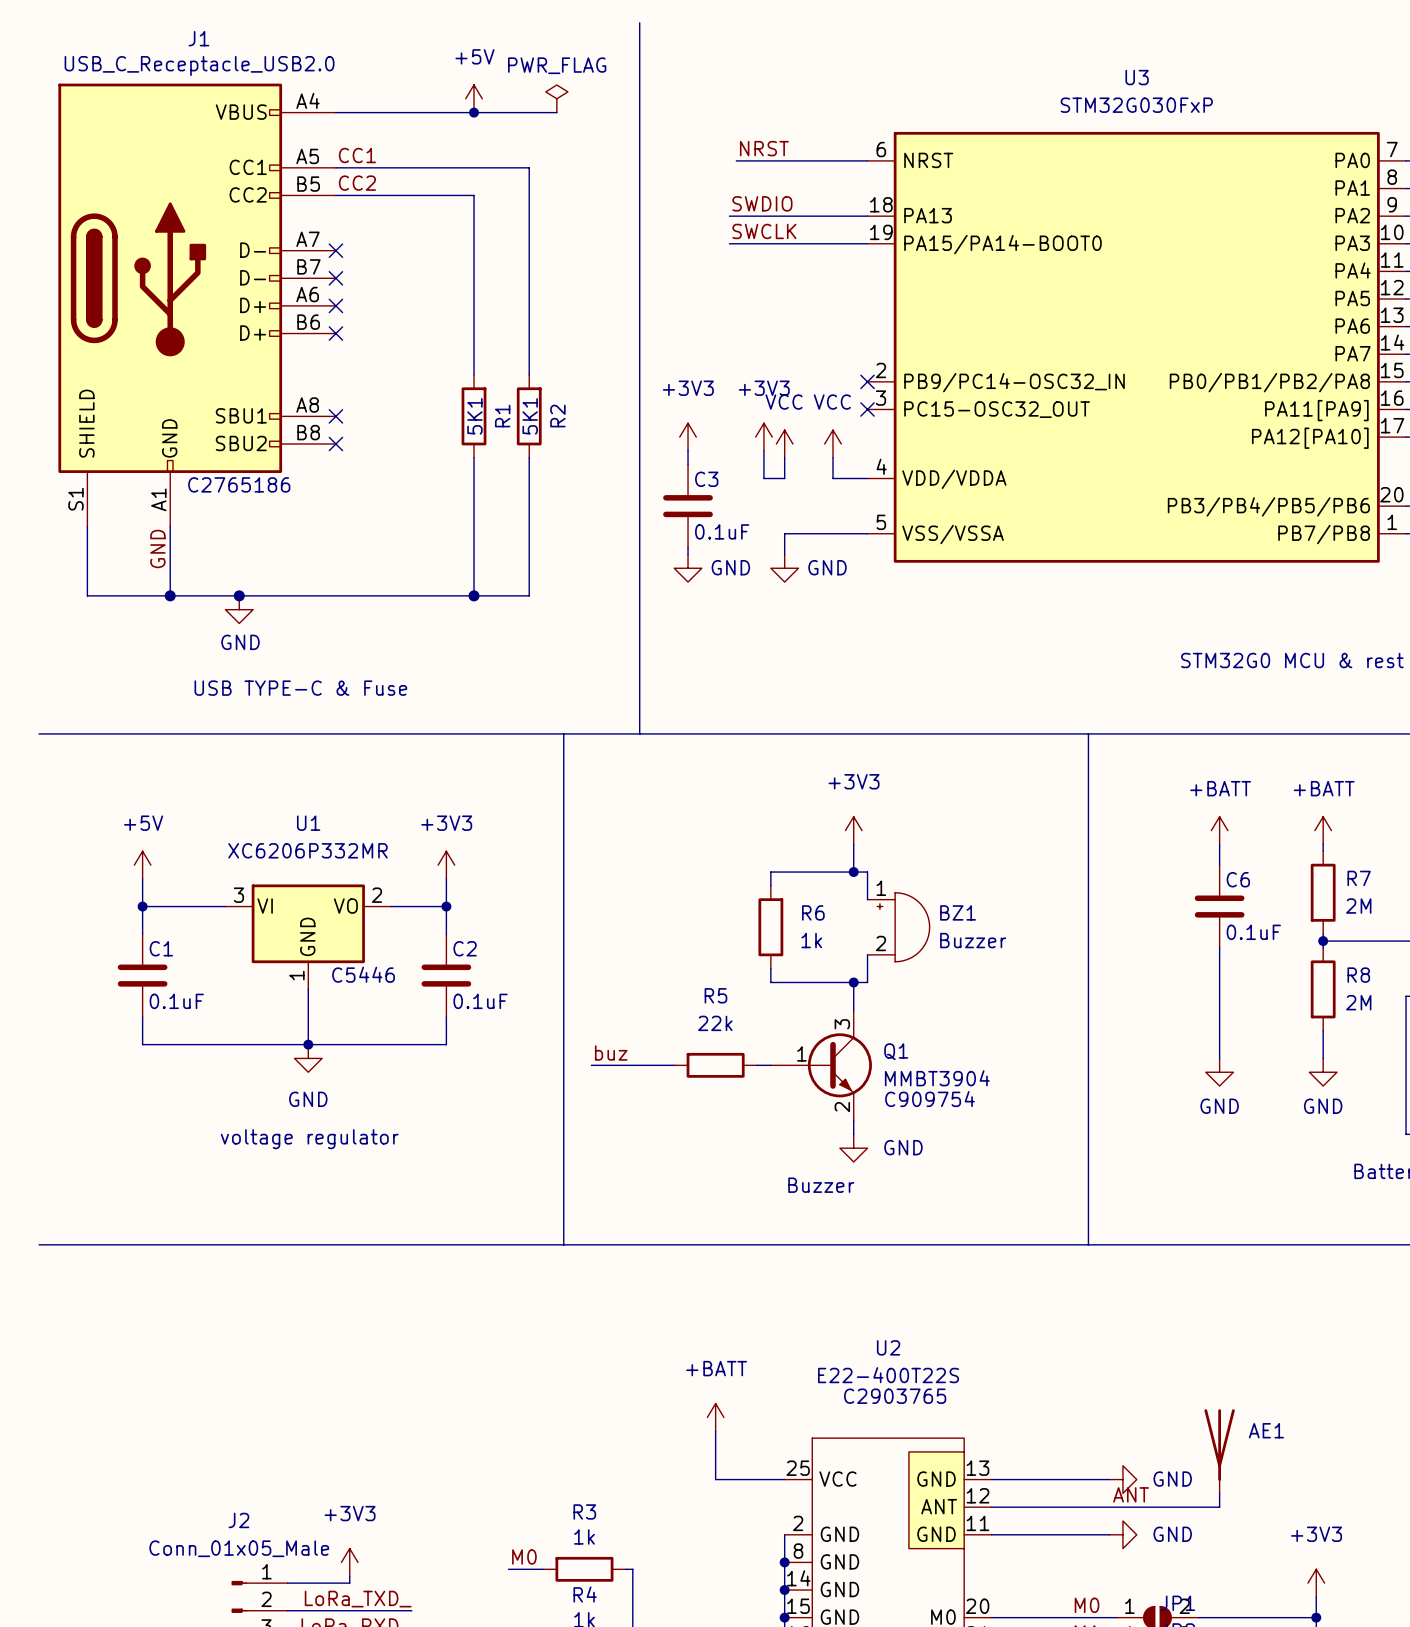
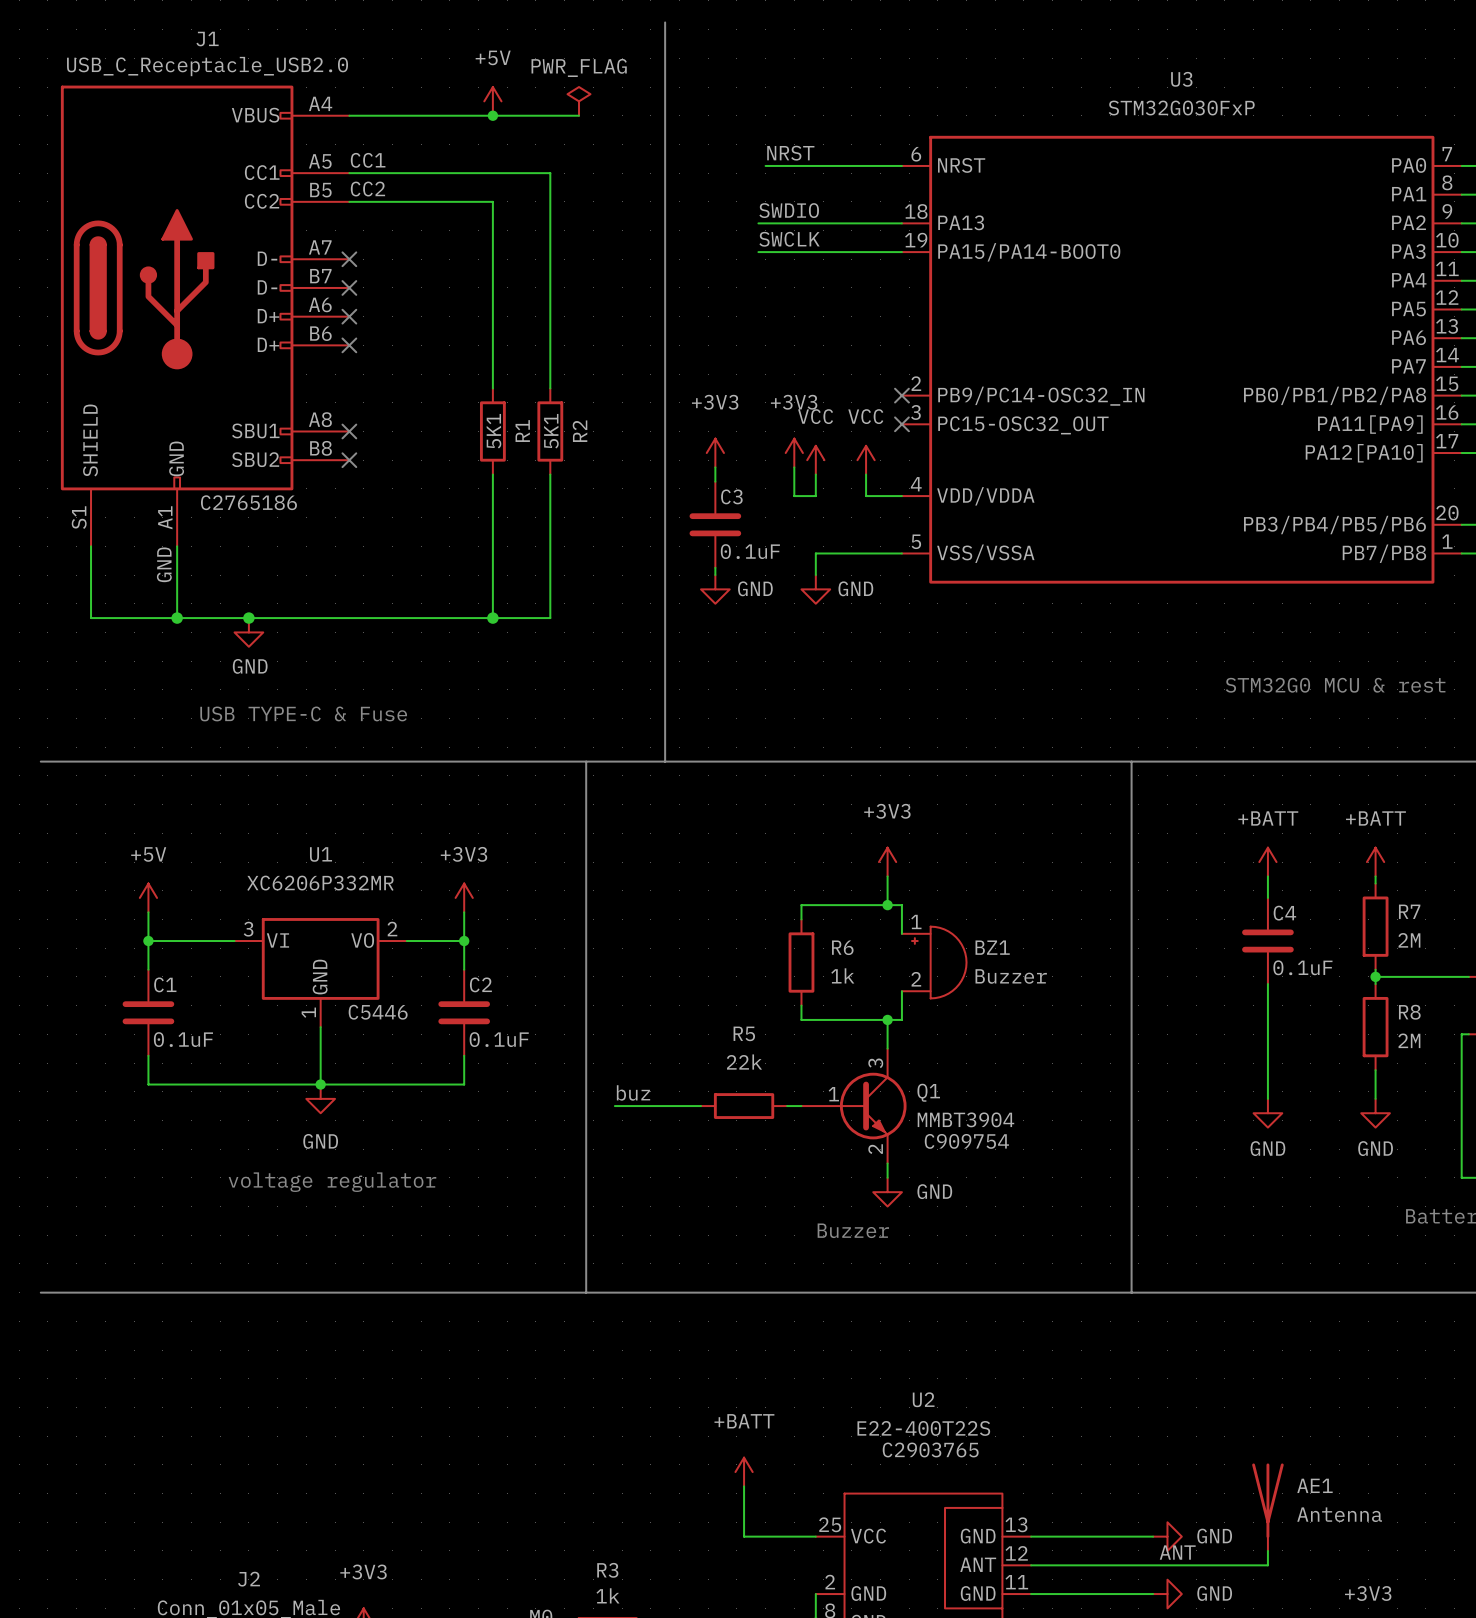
C6 name: C6 (1238, 879) -> C4 (1284, 913)
AE1 value: none -> Antenna (1339, 1514)

